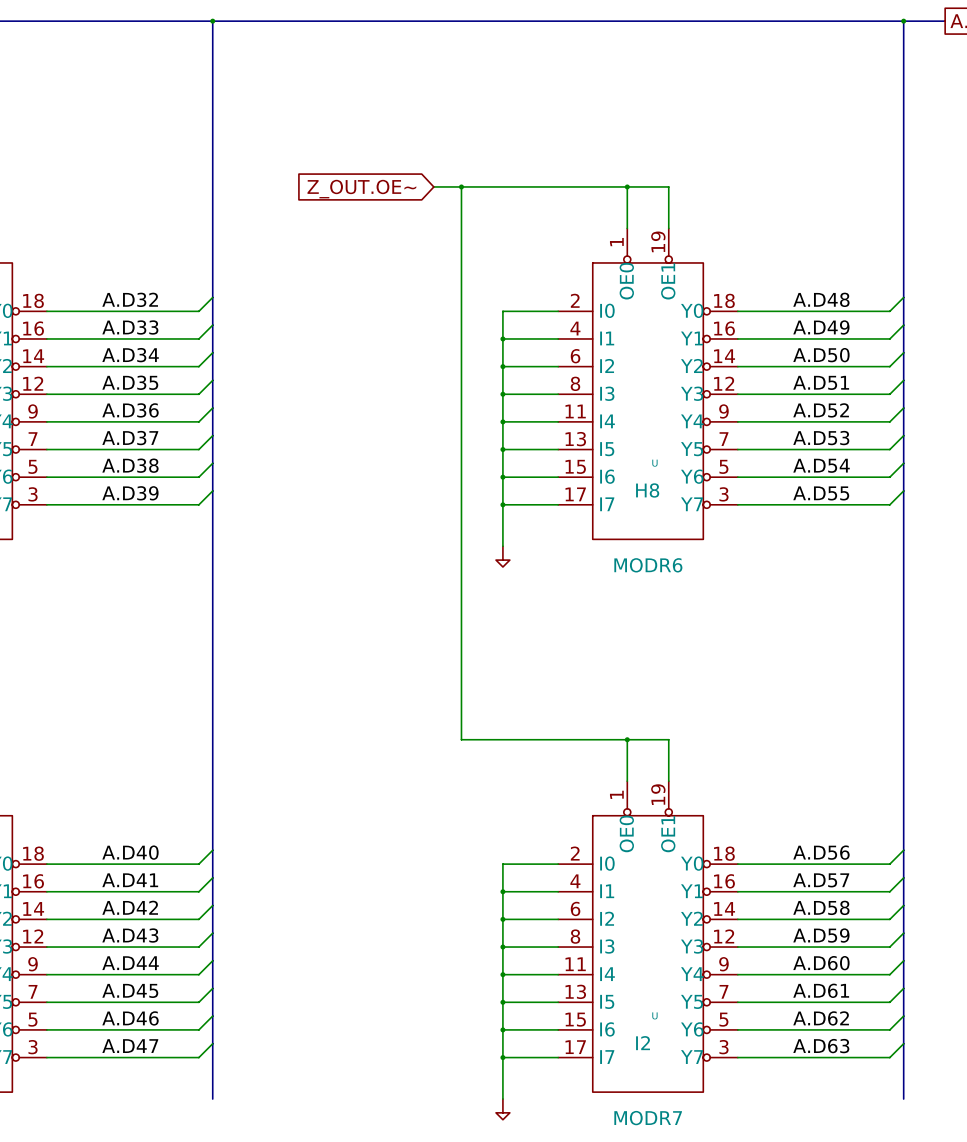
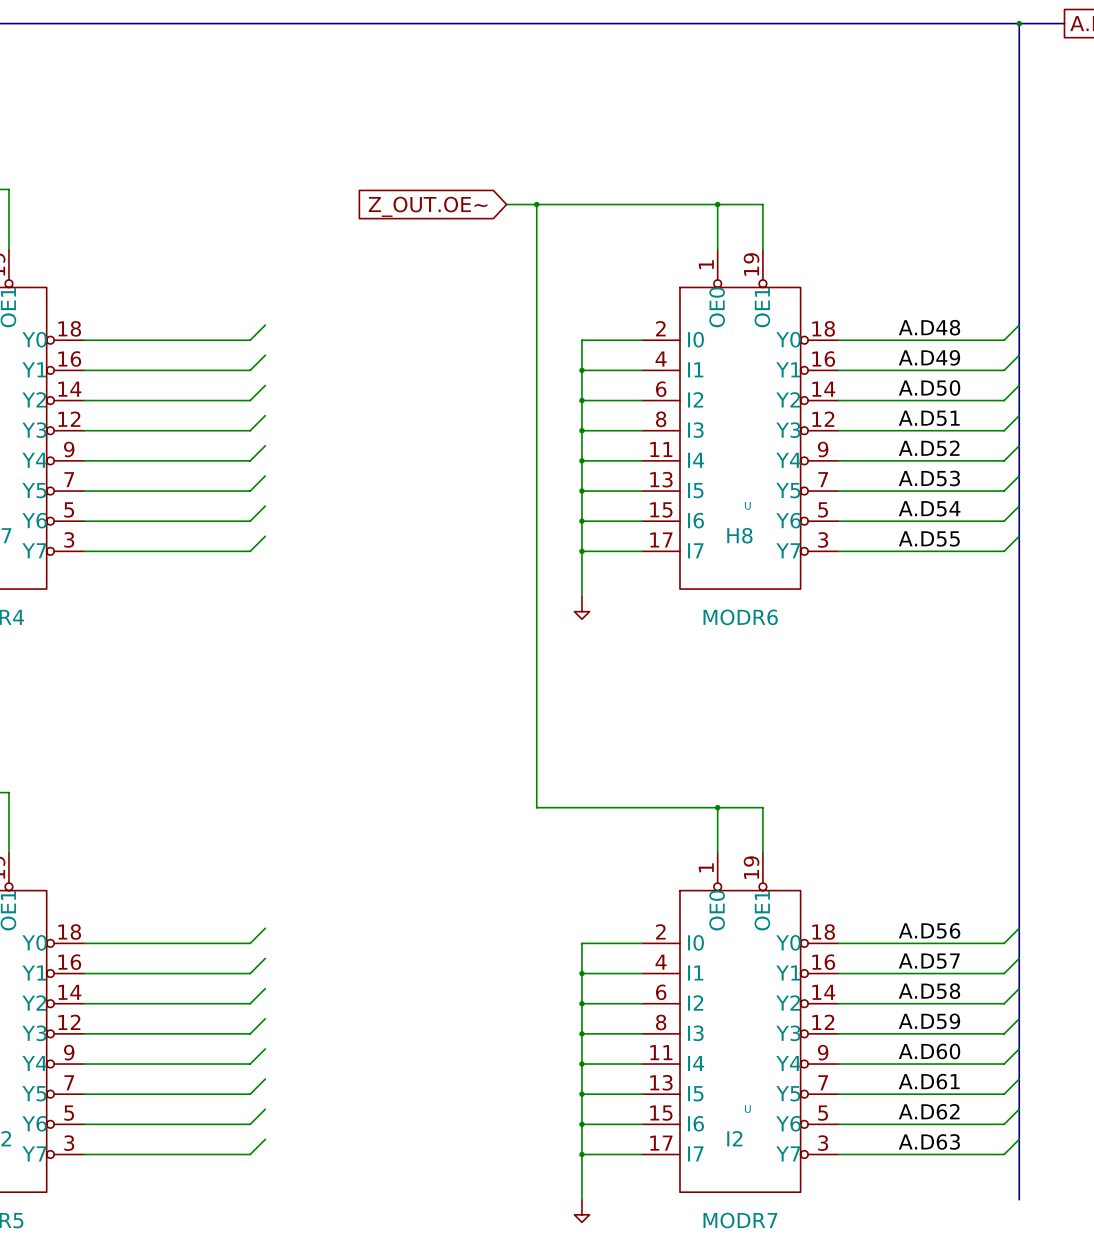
bus: (212, 21) (212, 1099) -> none
junction: (212, 21) -> none
label: A.D32 (130, 299) -> none
label: A.D33 (130, 327) -> none
label: A.D34 (130, 355) -> none
label: A.D35 (130, 382) -> none
label: A.D36 (130, 410) -> none
label: A.D37 (130, 438) -> none
label: A.D38 (130, 465) -> none
label: A.D39 (130, 493) -> none
label: A.D40 (130, 852) -> none
label: A.D41 (130, 880) -> none
label: A.D42 (130, 907) -> none
label: A.D43 (130, 935) -> none
label: A.D44 (130, 963) -> none
label: A.D45 (130, 990) -> none
label: A.D46 (130, 1018) -> none
label: A.D47 (130, 1046) -> none

